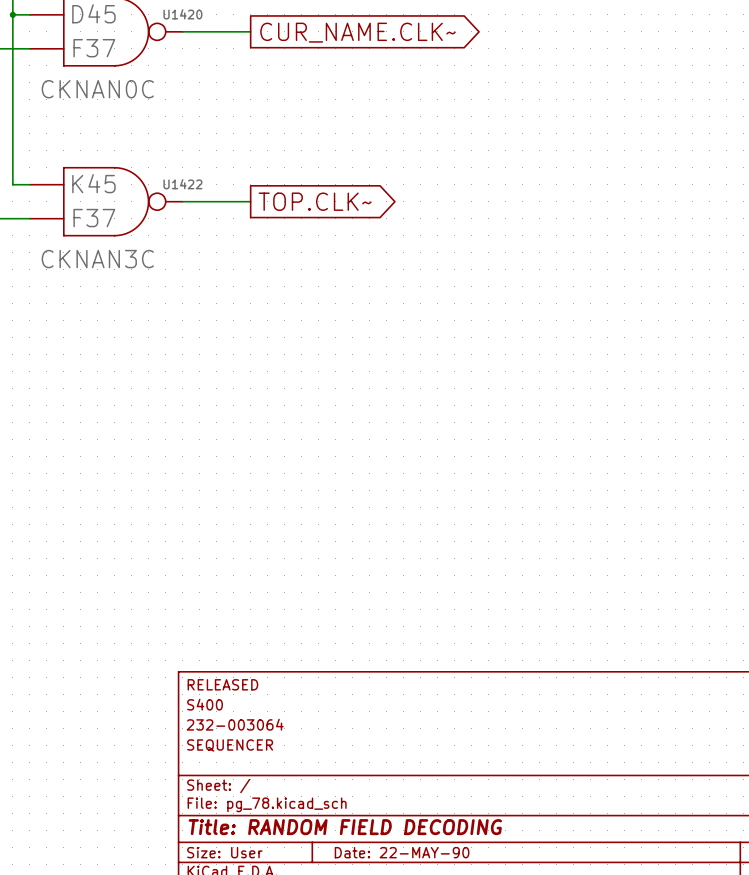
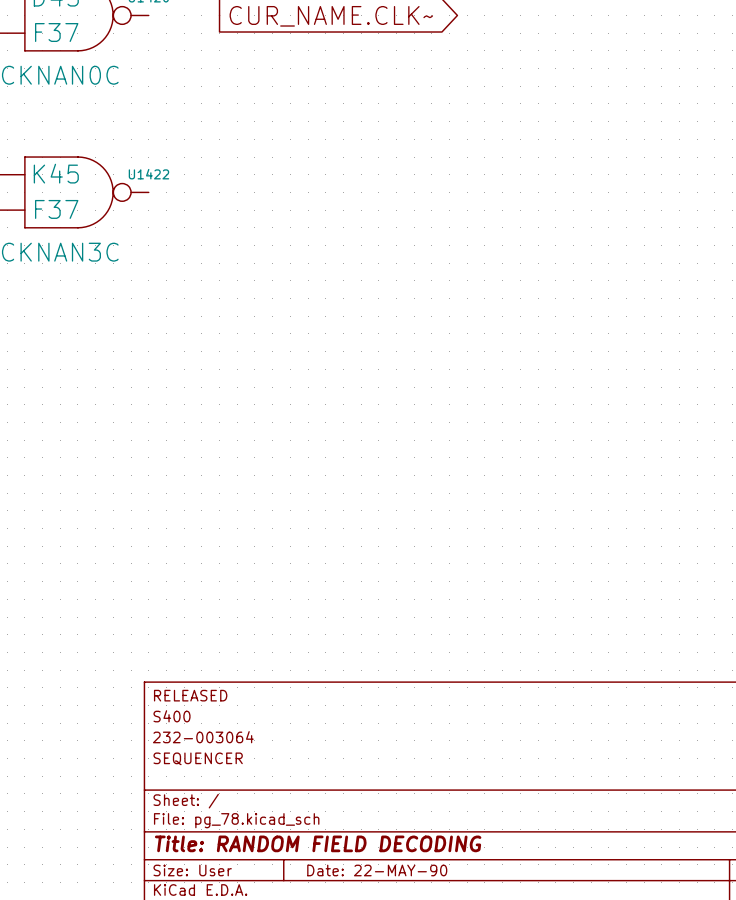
wire: (182, 31) (250, 31) -> none
wire: (182, 201) (250, 201) -> none
global label: TOP.CLK~ (315, 201) -> none

